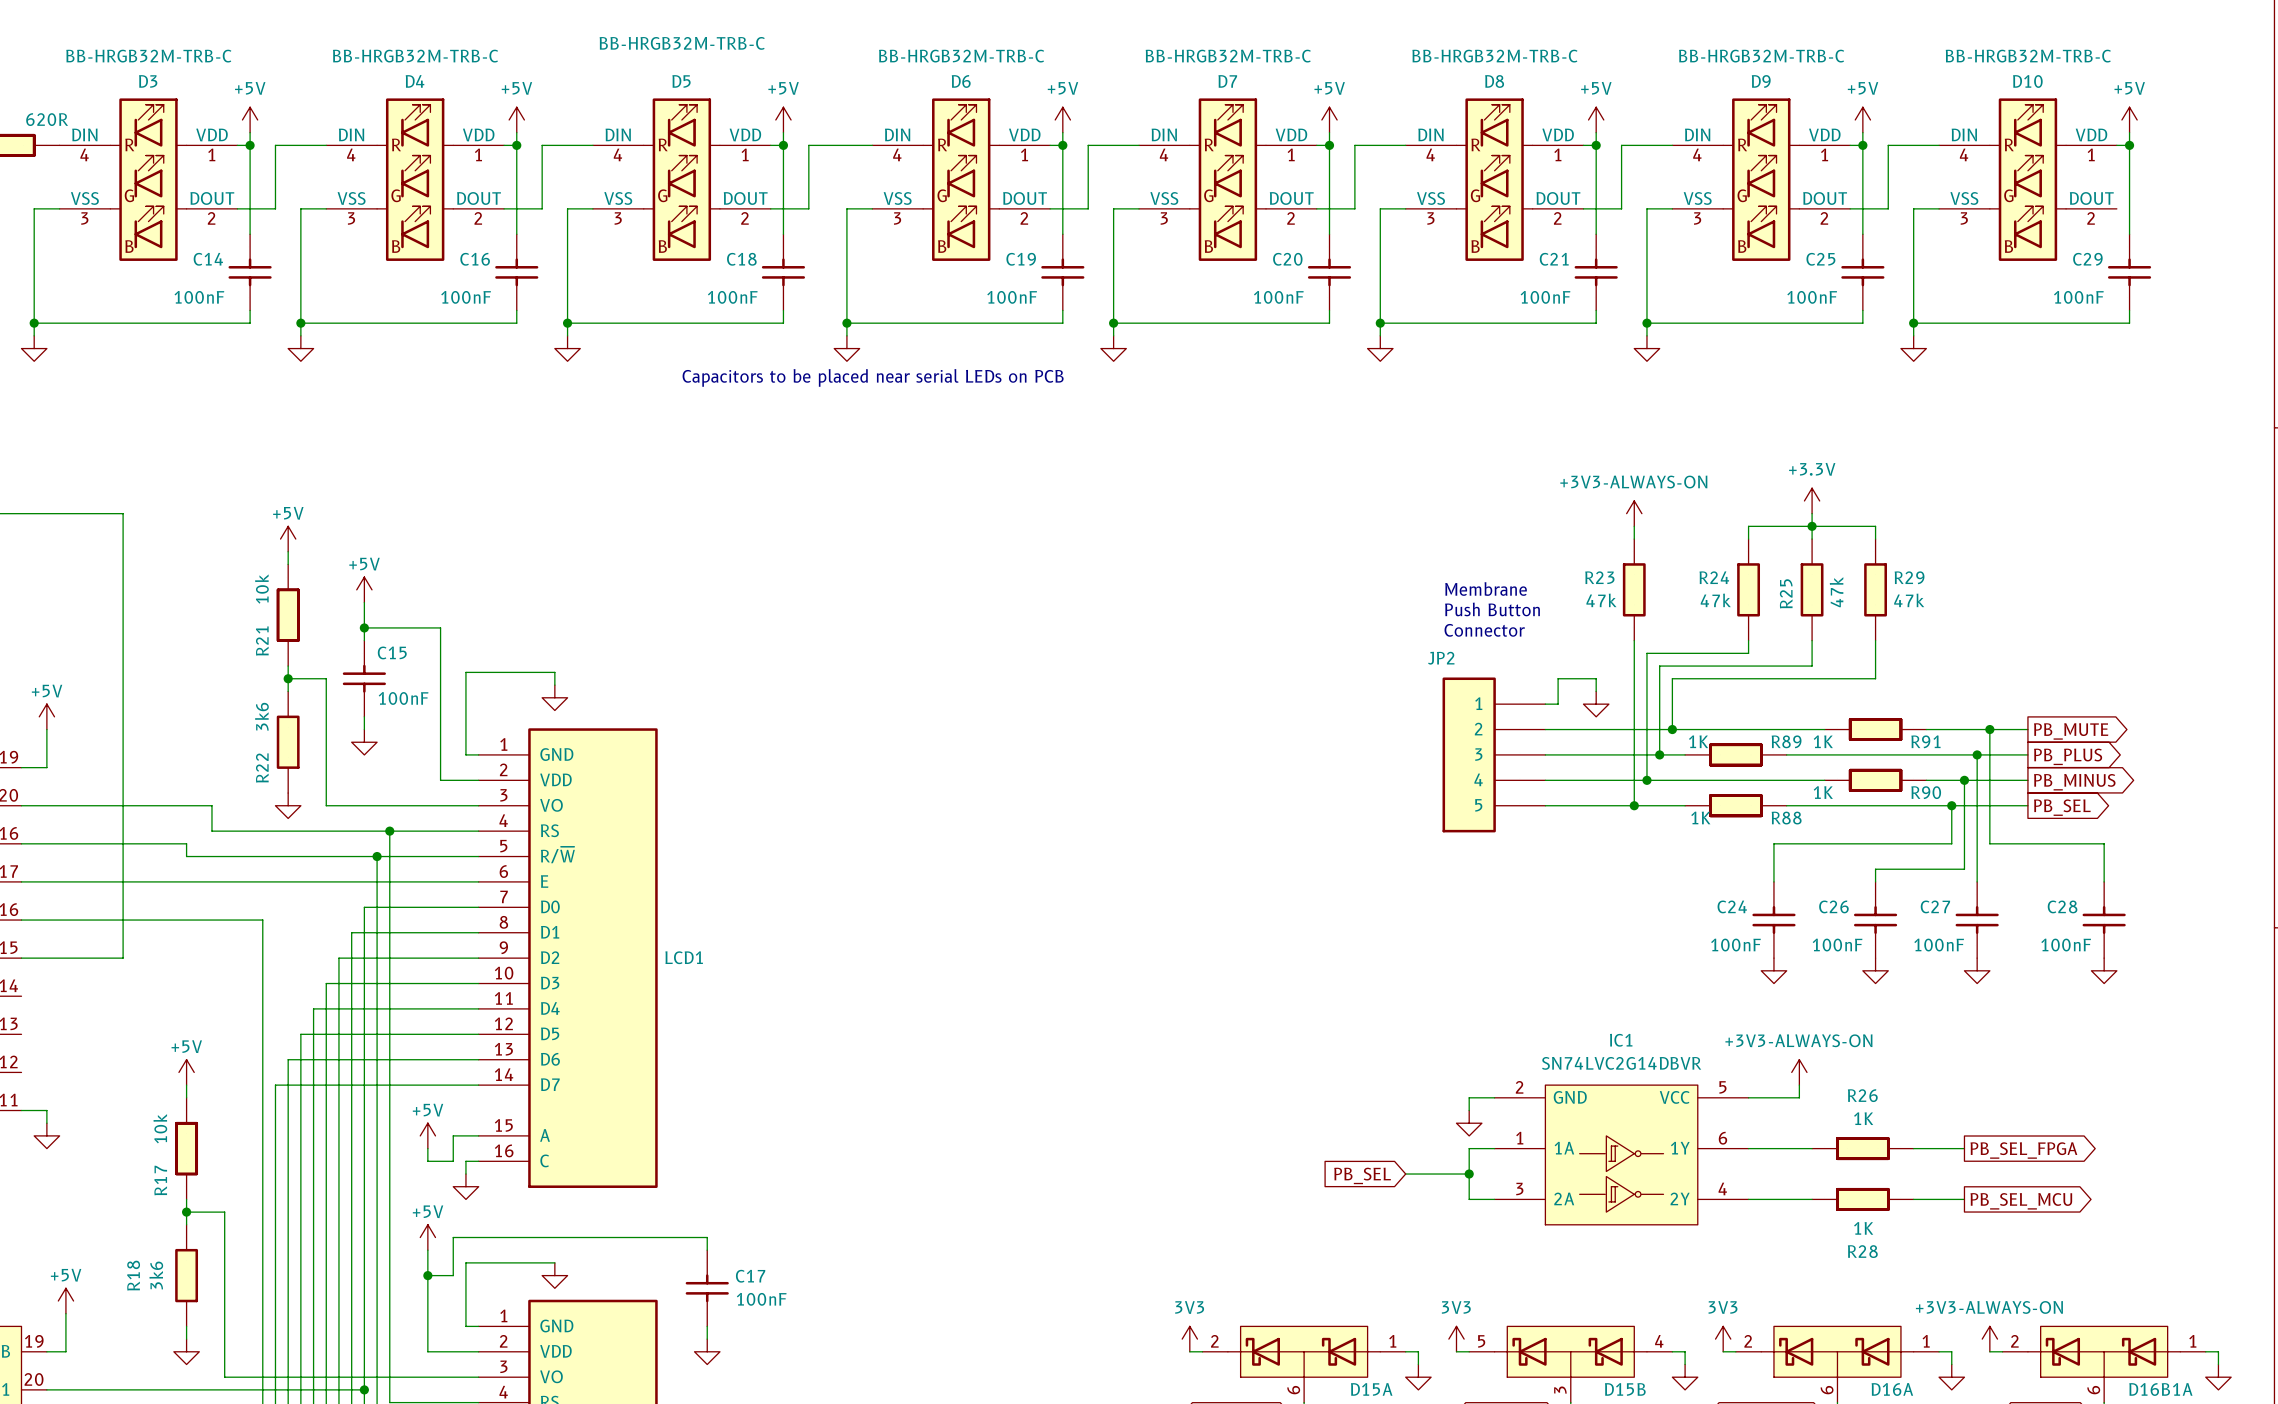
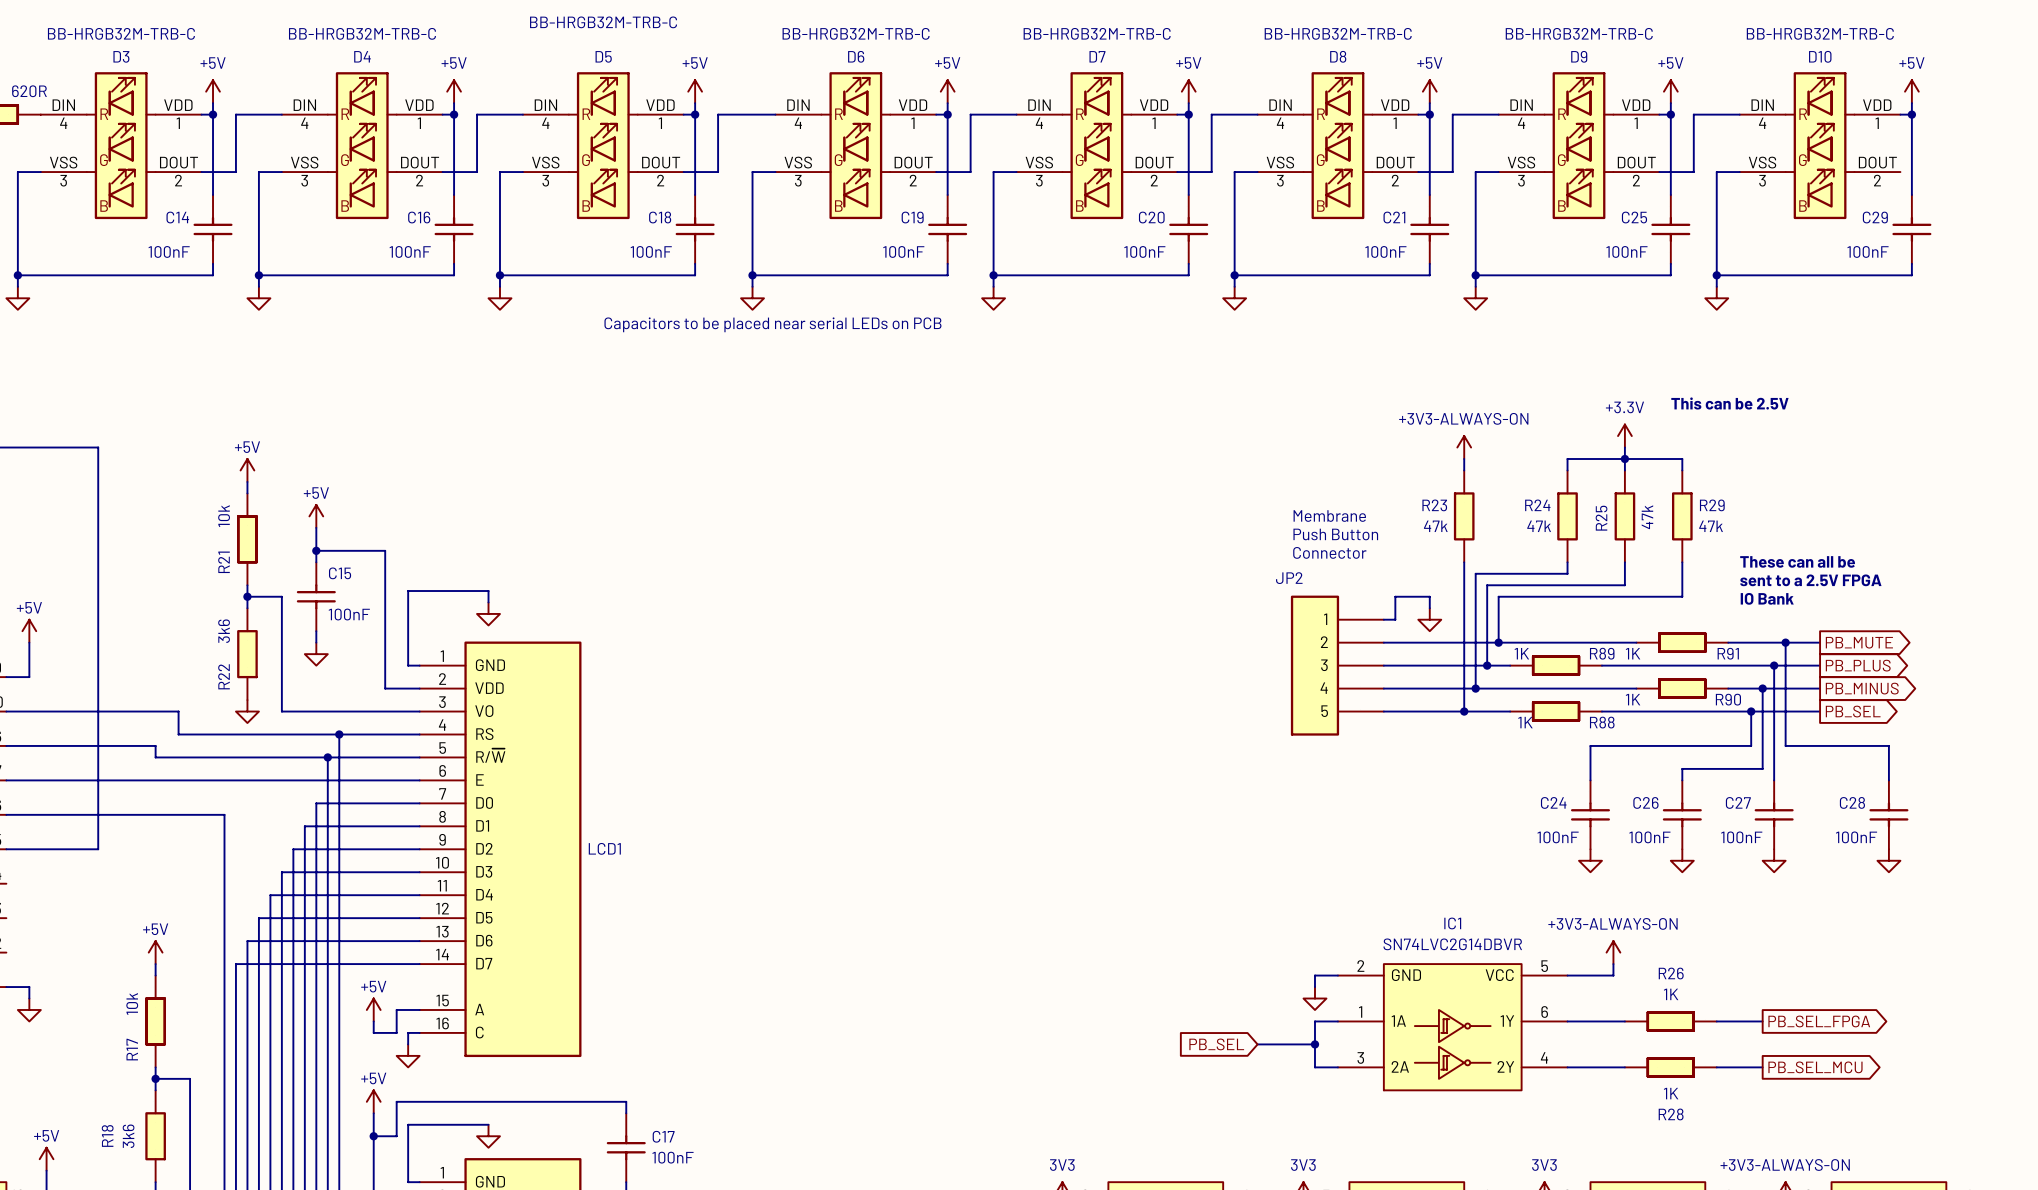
text: none -> This can be 2.5V (1729, 403)
text: none -> These can all be (1797, 561)
text: none -> sent to a 2.5V FPGA (1810, 580)
text: none -> IO Bank (1767, 598)

